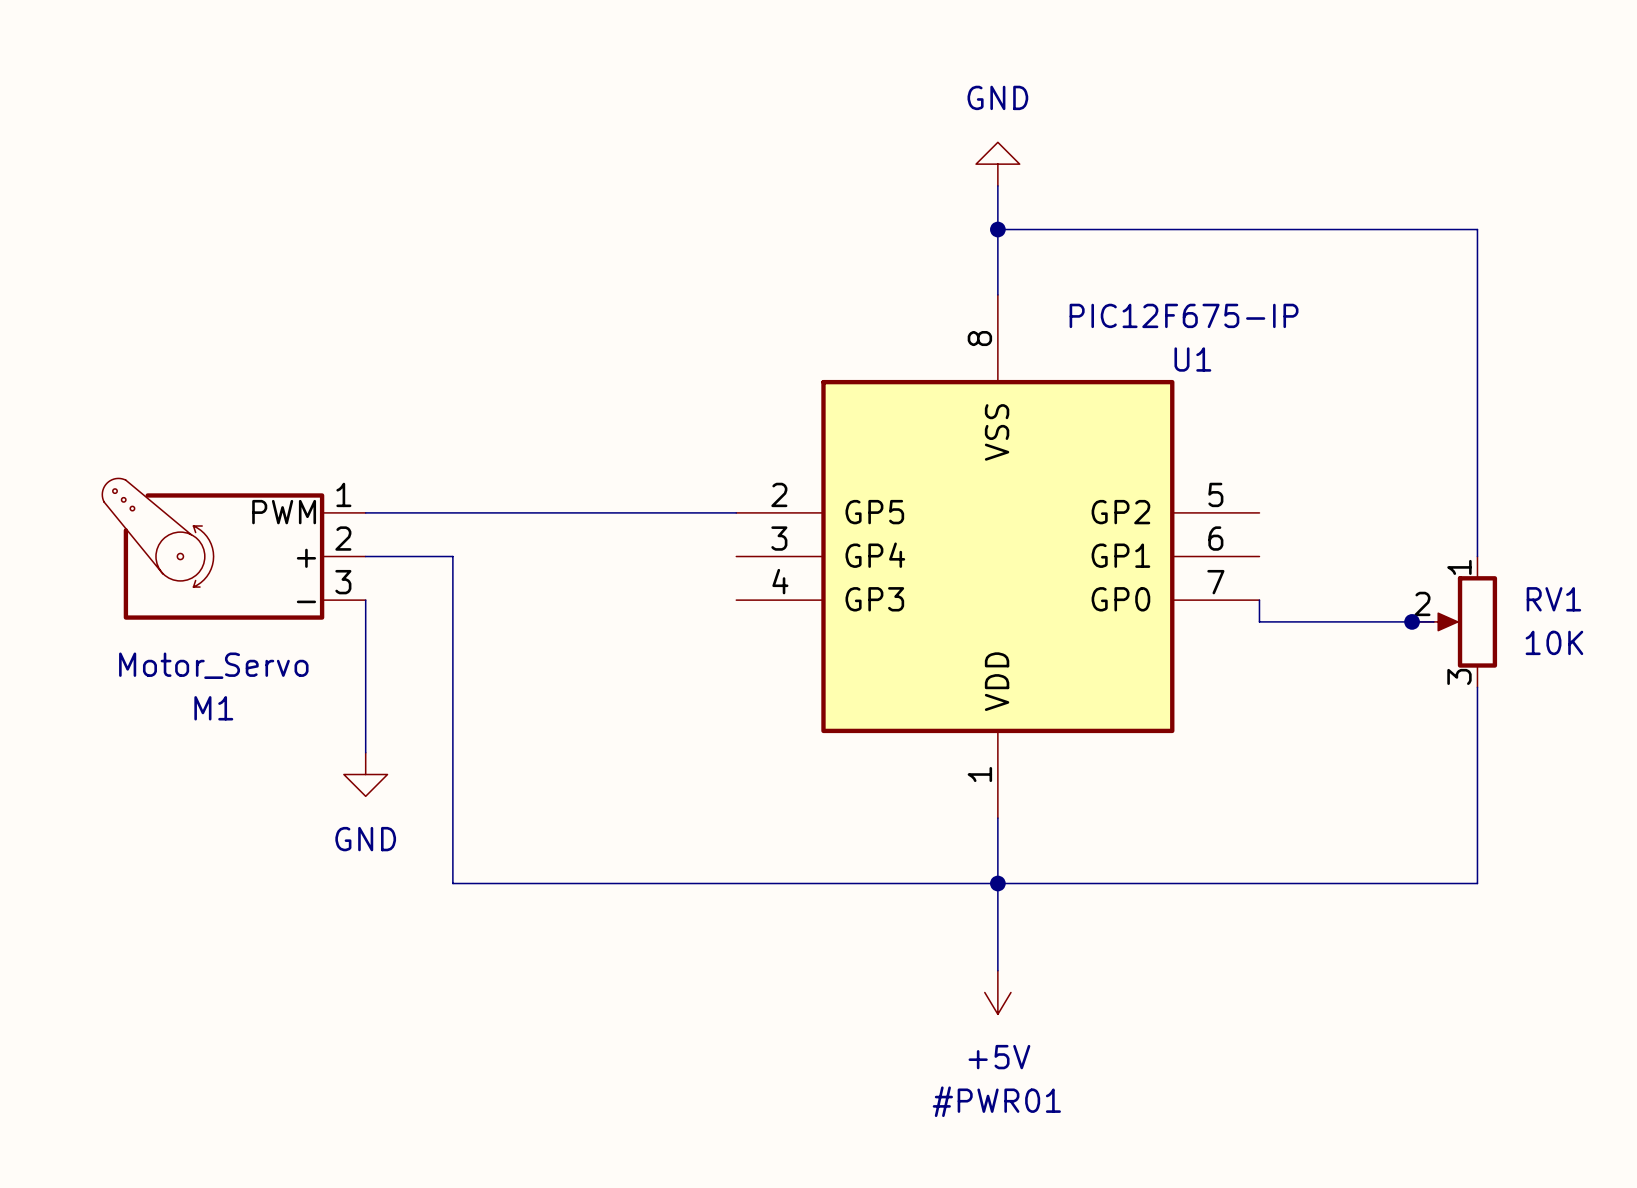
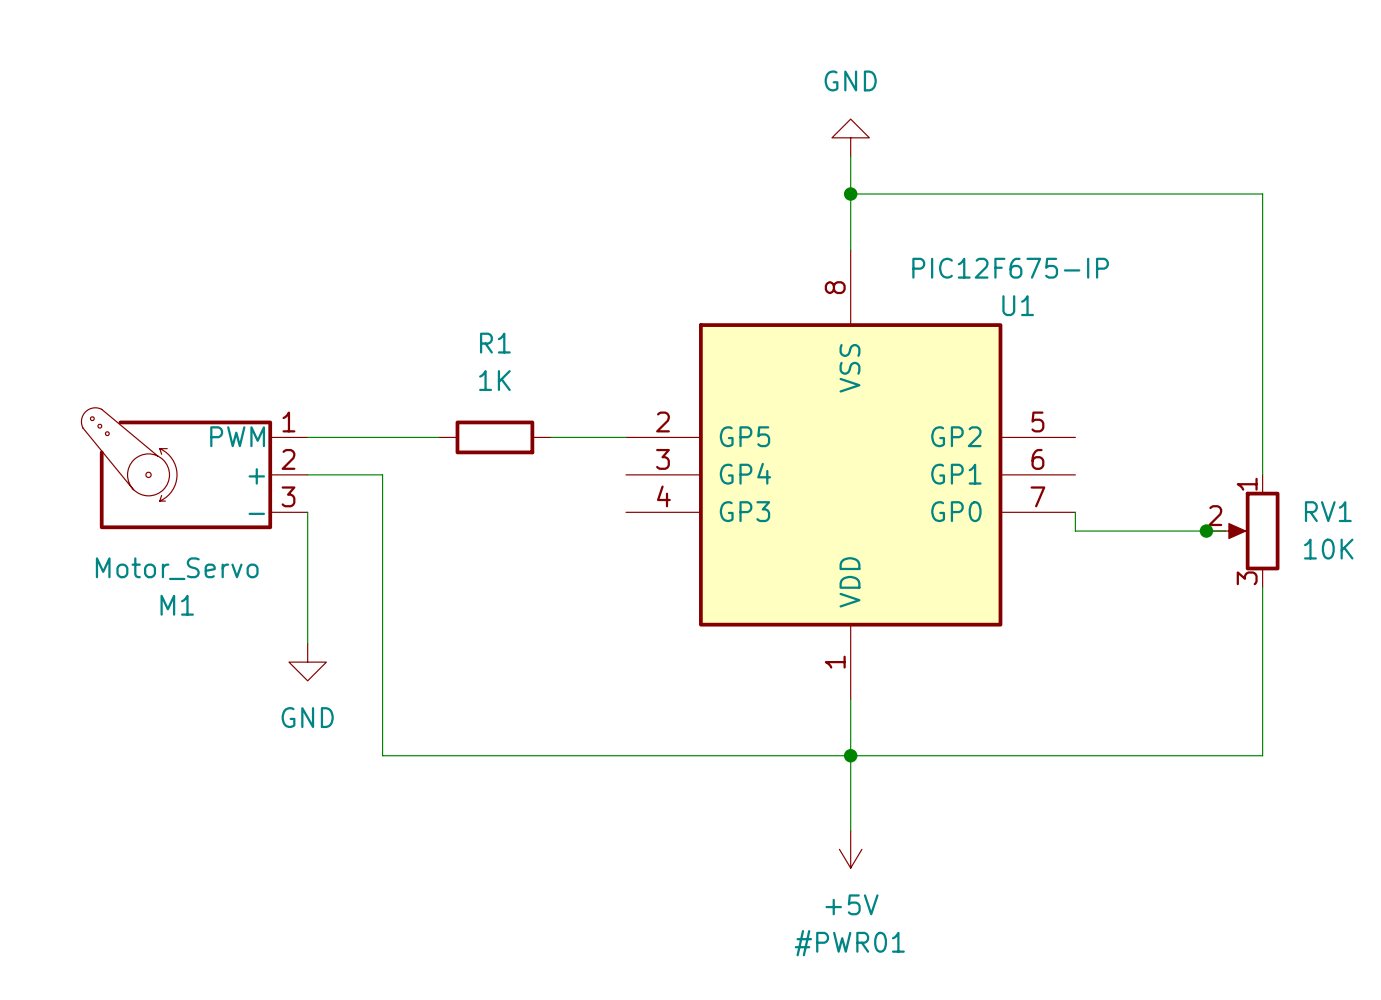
wire: (518, 512) (649, 512) -> none
R1: none -> 1K (494, 437)

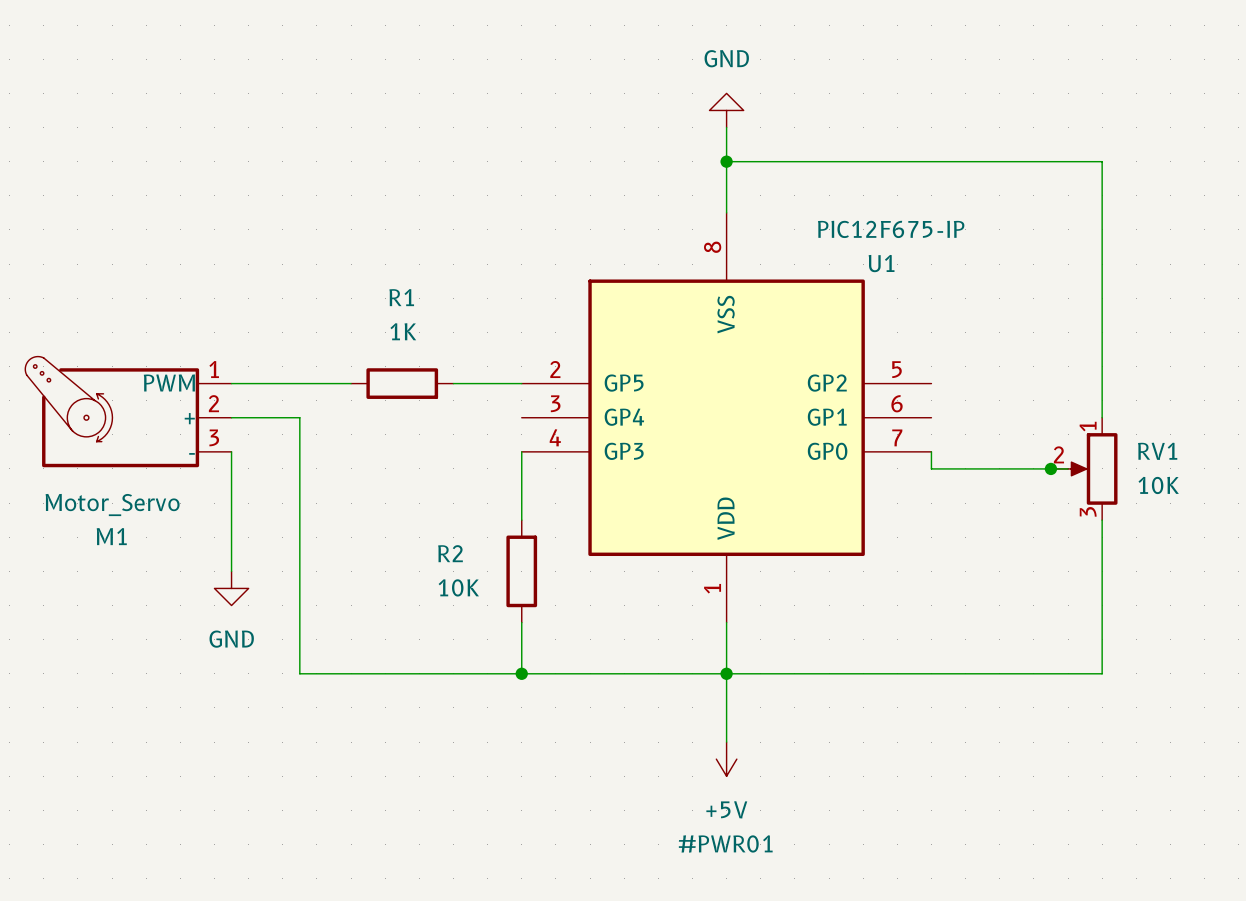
wire: none -> (521, 451) (521, 520)
R2: none -> 10K (521, 571)
wire: none -> (521, 622) (521, 673)
junction: none -> (521, 673)

